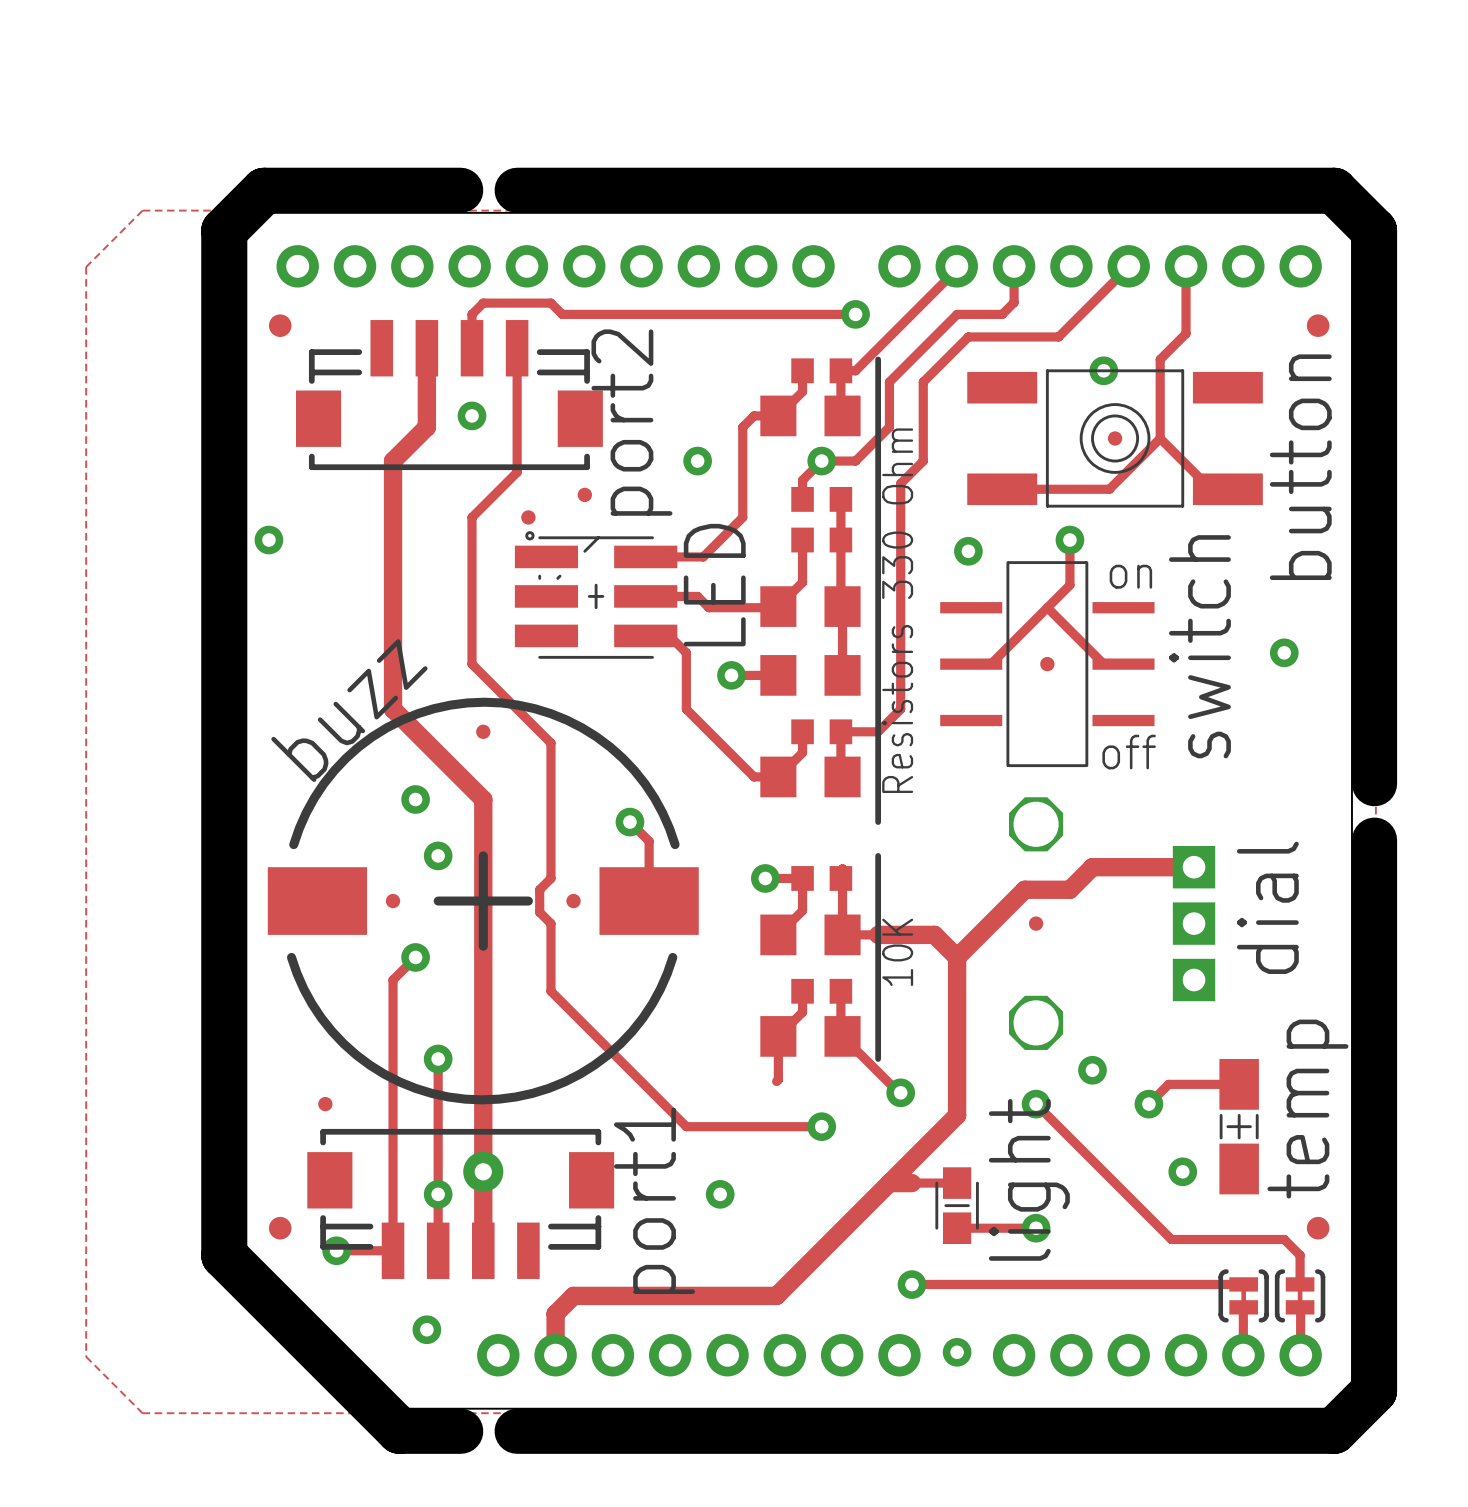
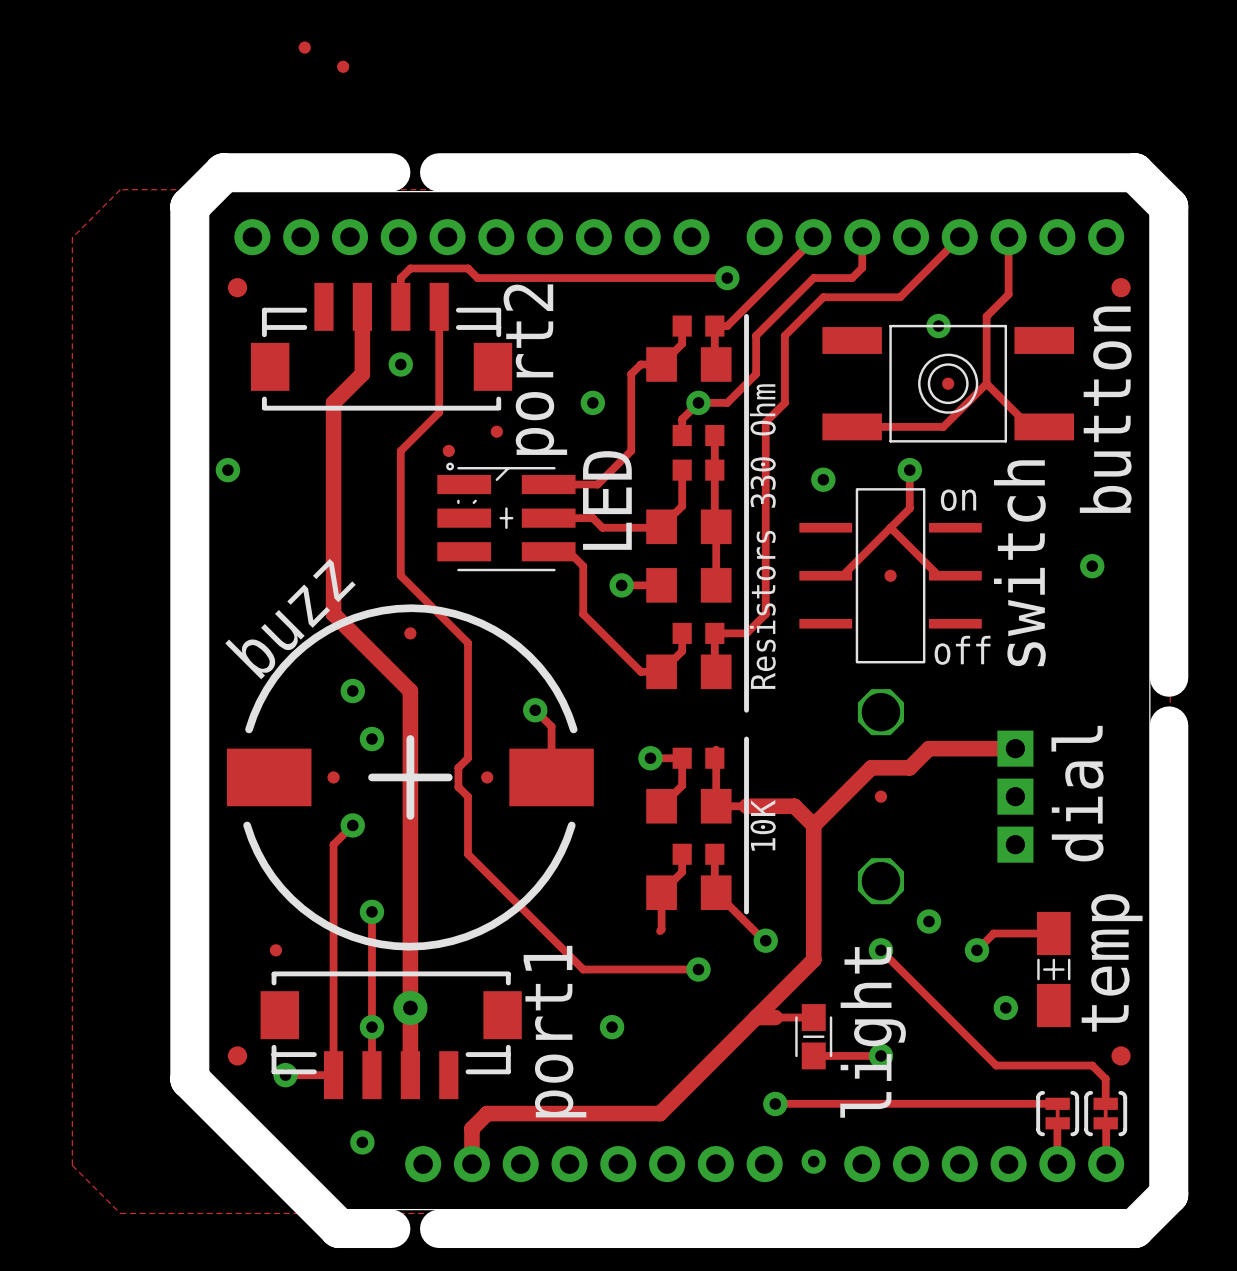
part: none -> (304, 47)
part: none -> (343, 66)

